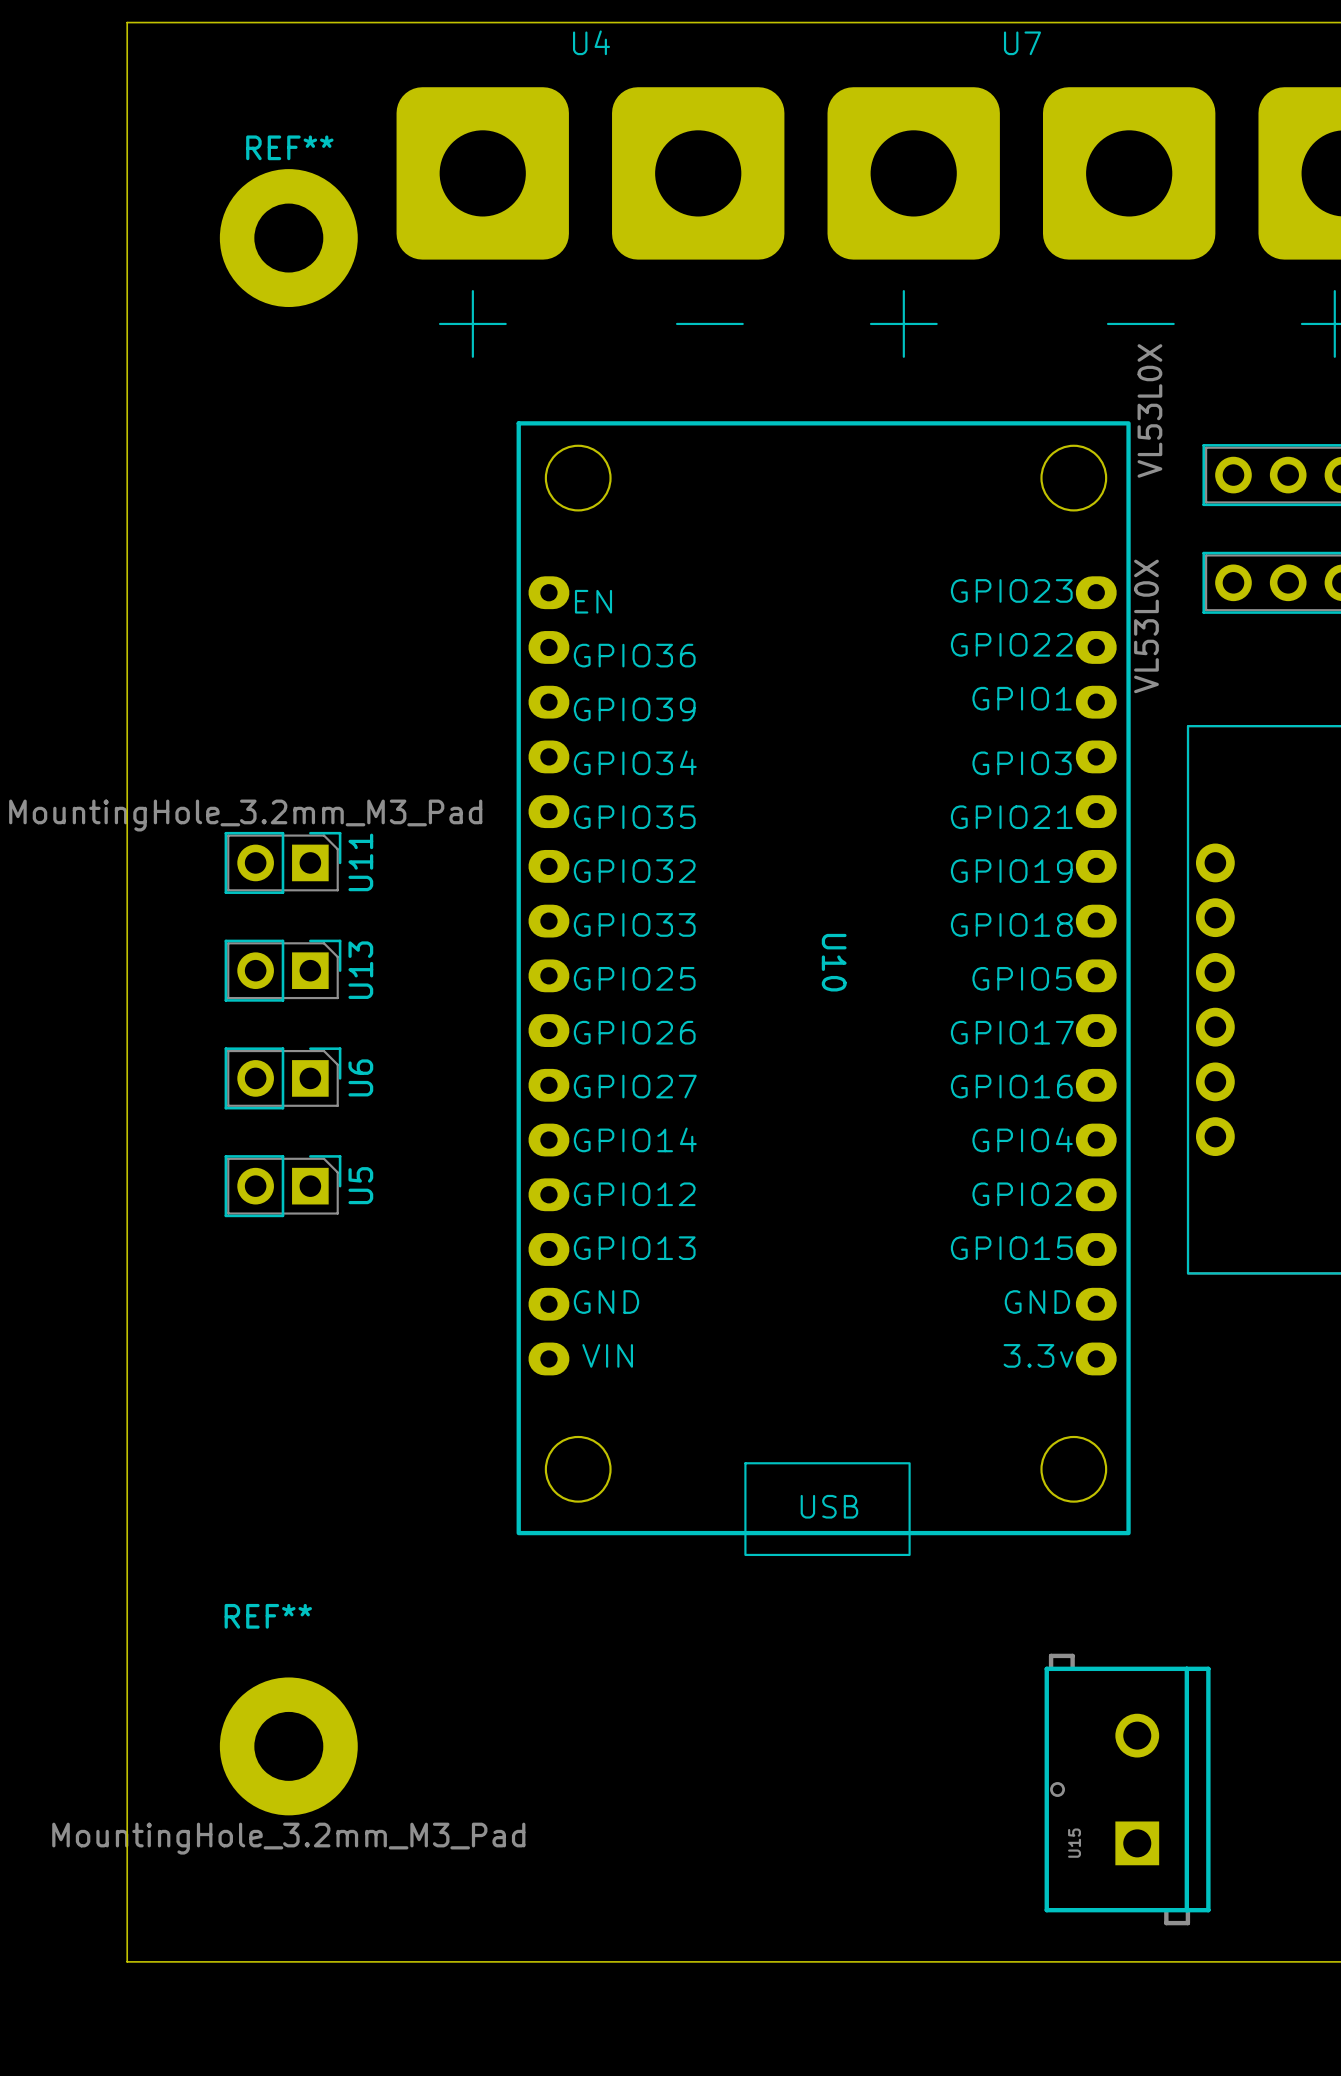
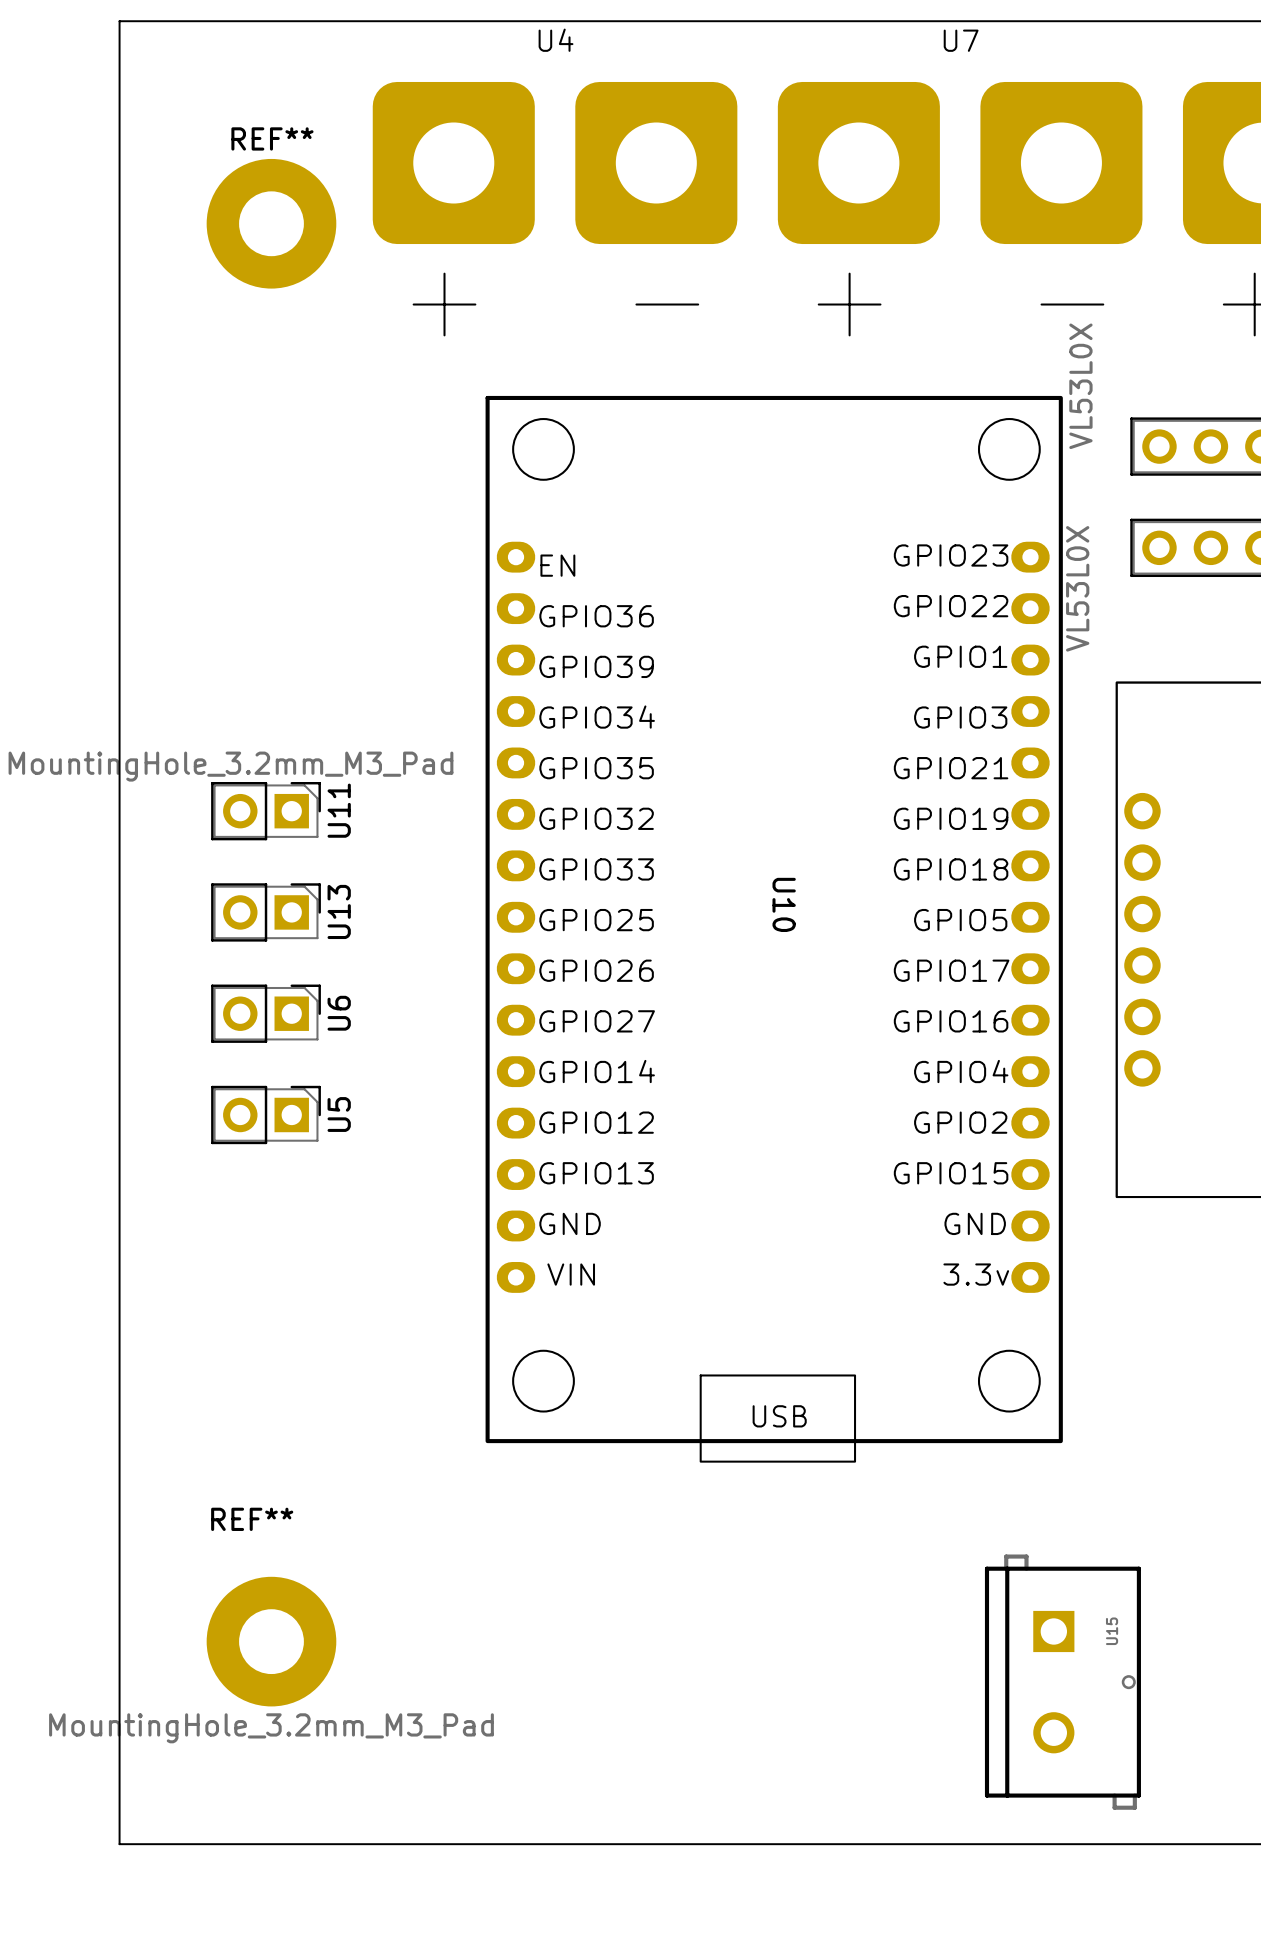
U15 rotation: 0° (1127, 1789) -> 180° (1062, 1682)

